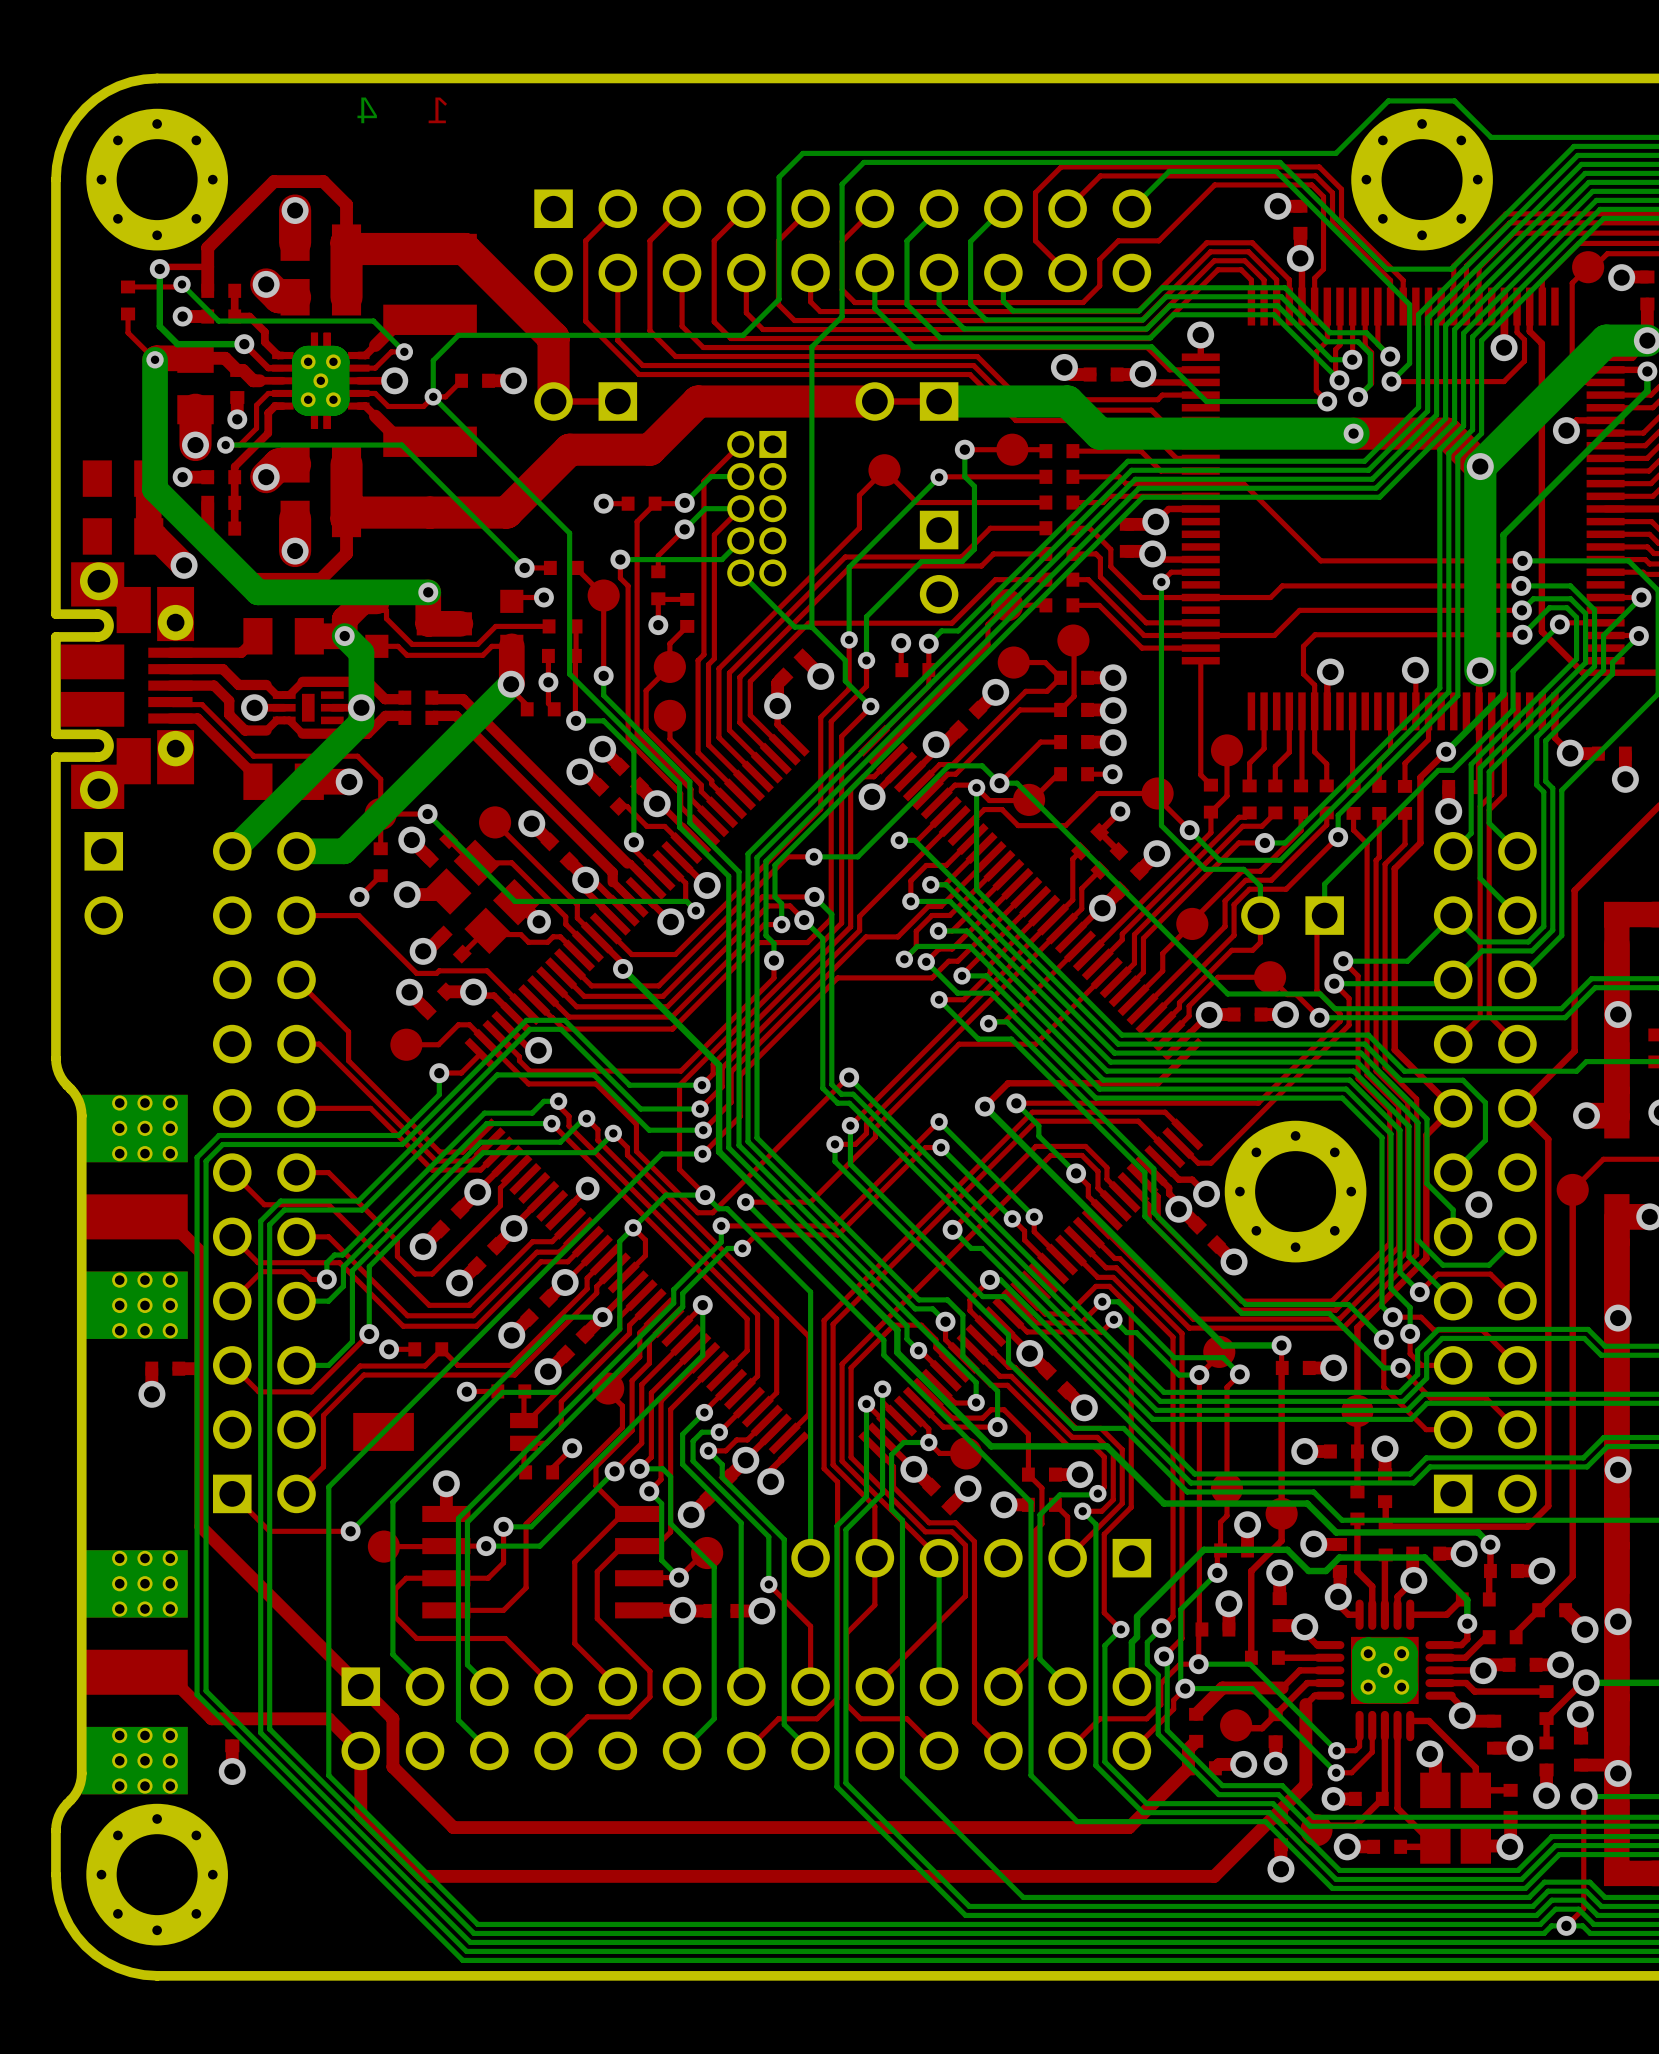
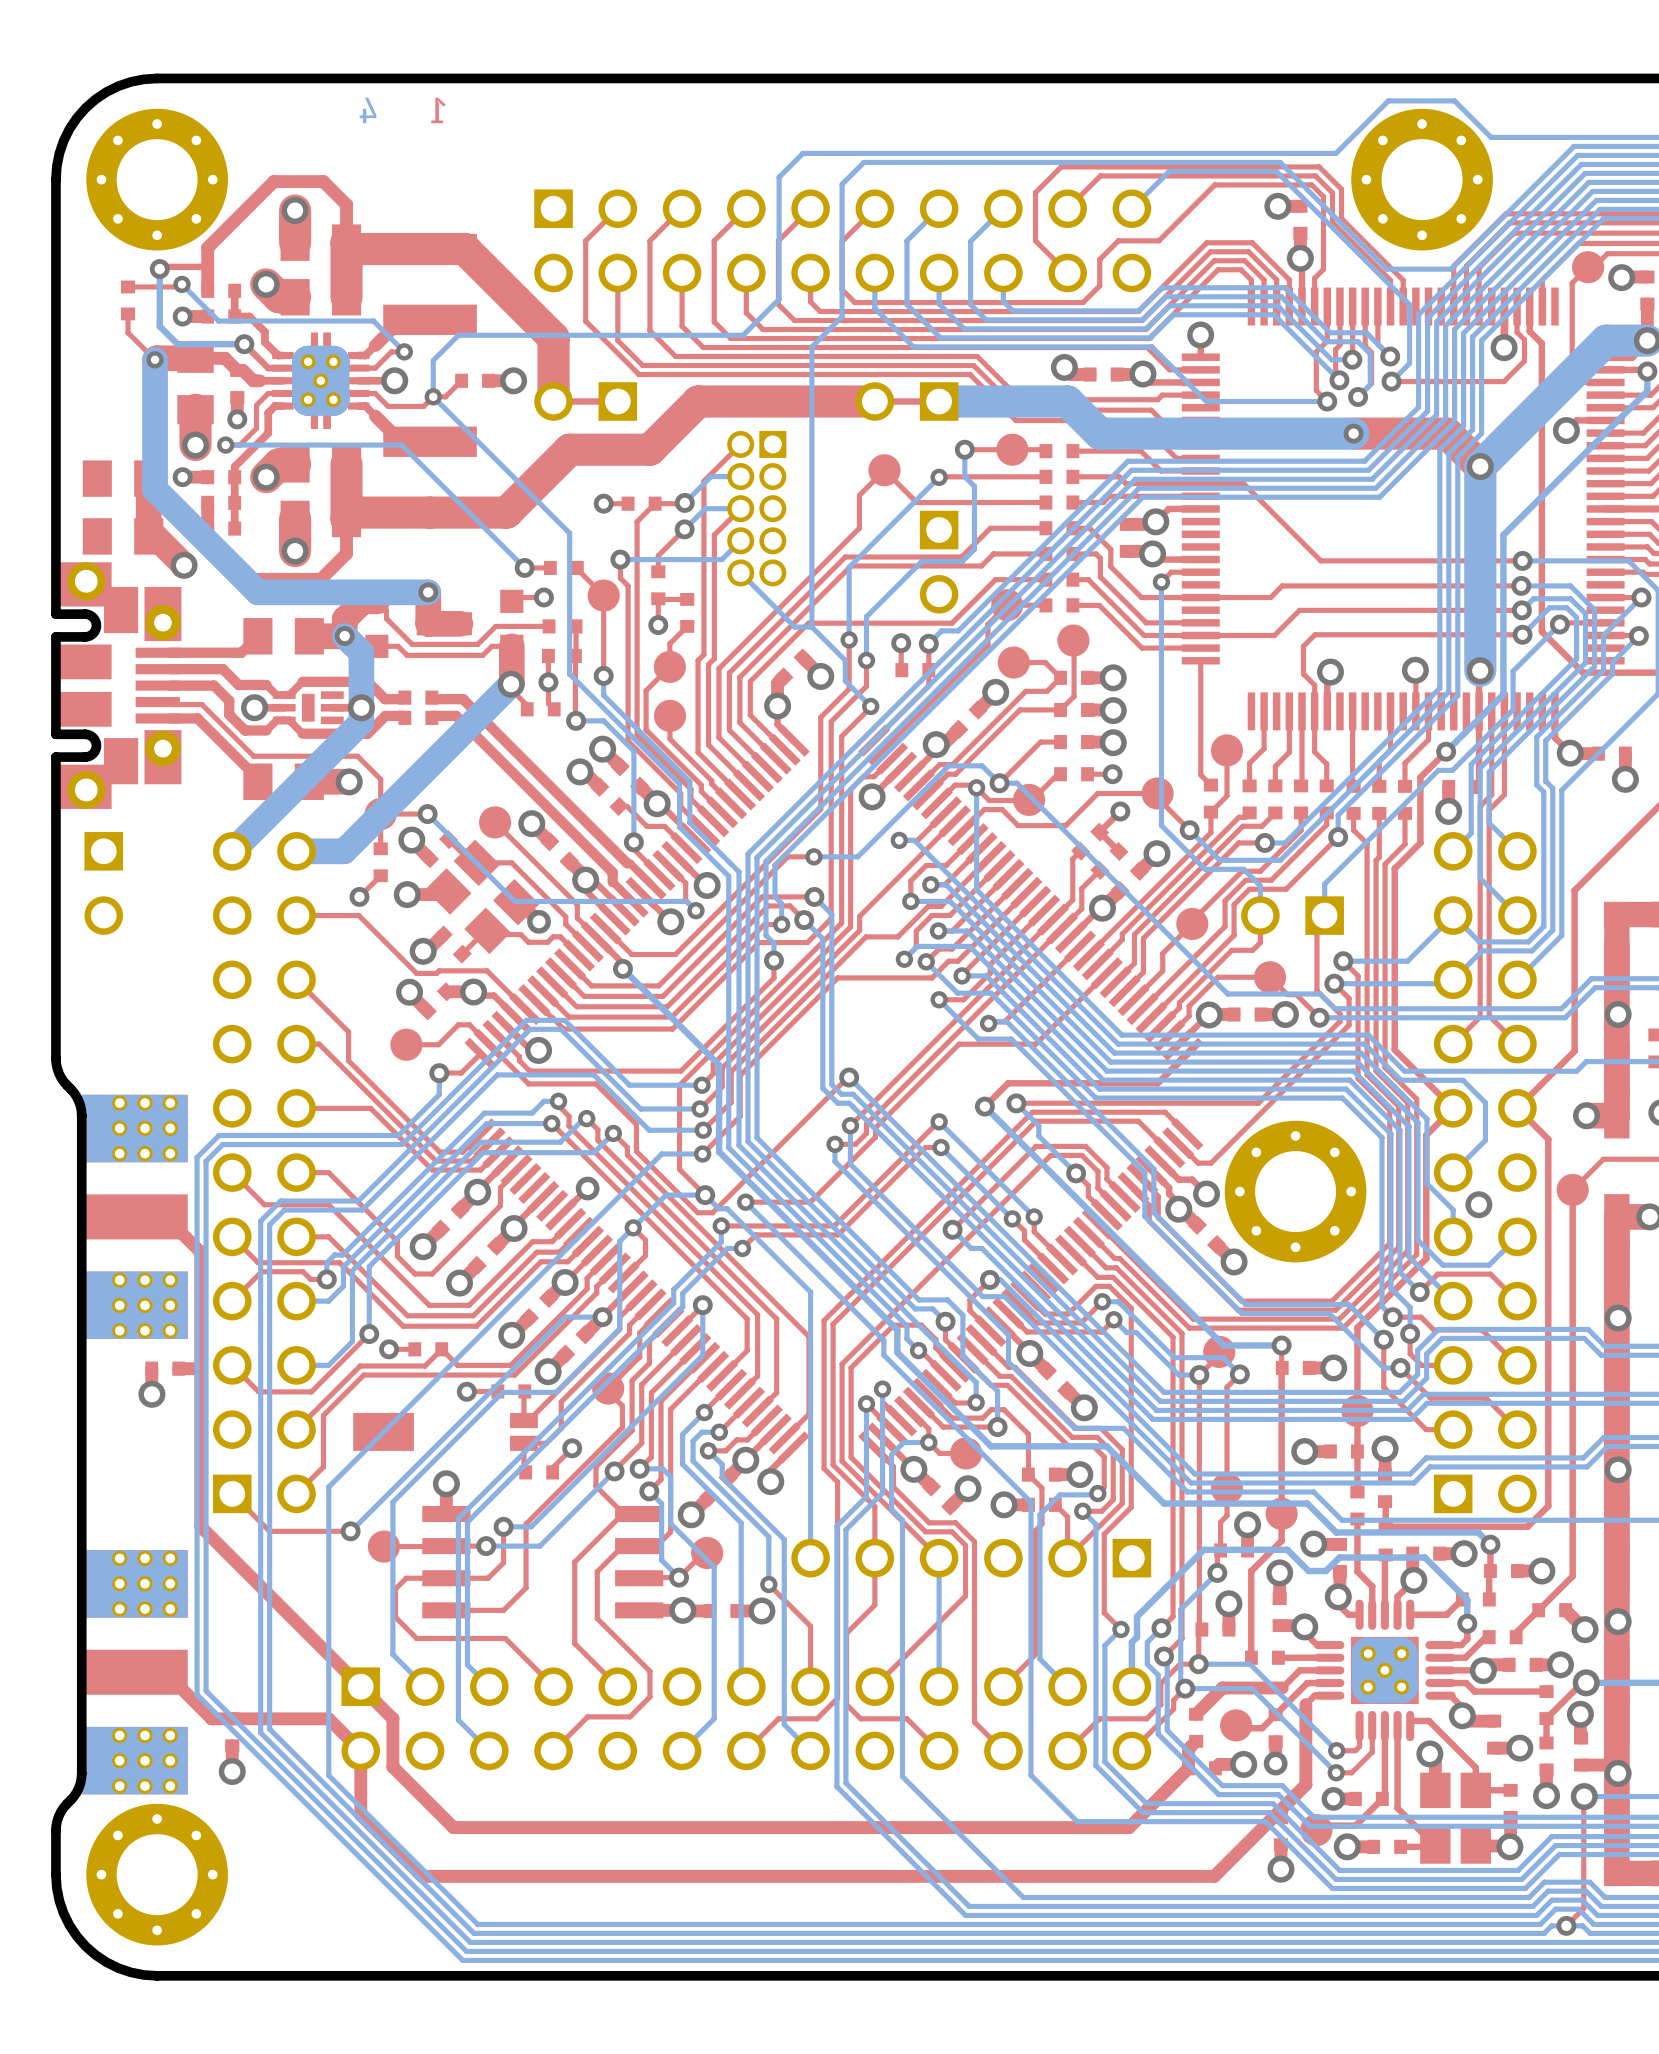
part footprint: [61, 562, 195, 809] -> [58, 562, 182, 809]
board edge: (85, 614) (102, 615) (107, 619) (109, 625) (107, 631) (102, 636) (85, 636) -> (85, 614) (93, 617) (96, 625) (93, 633) (85, 636)
board edge: (85, 734) (102, 735) (107, 740) (109, 745) (107, 751) (102, 756) (85, 757) -> (85, 734) (93, 737) (96, 745) (93, 753) (85, 757)

